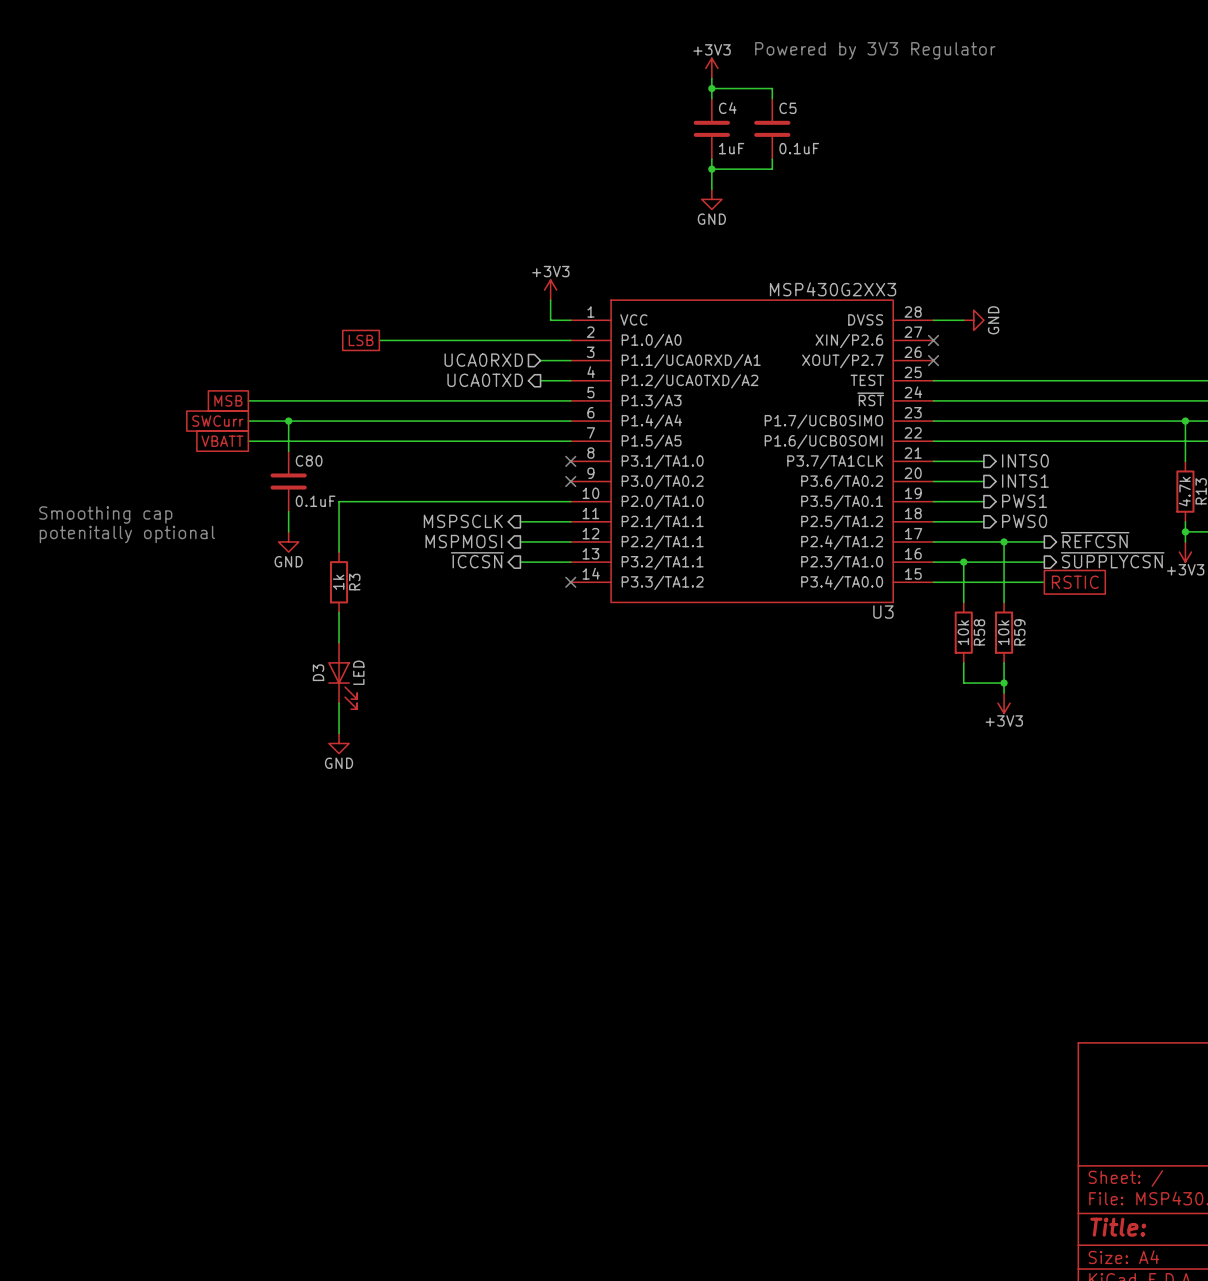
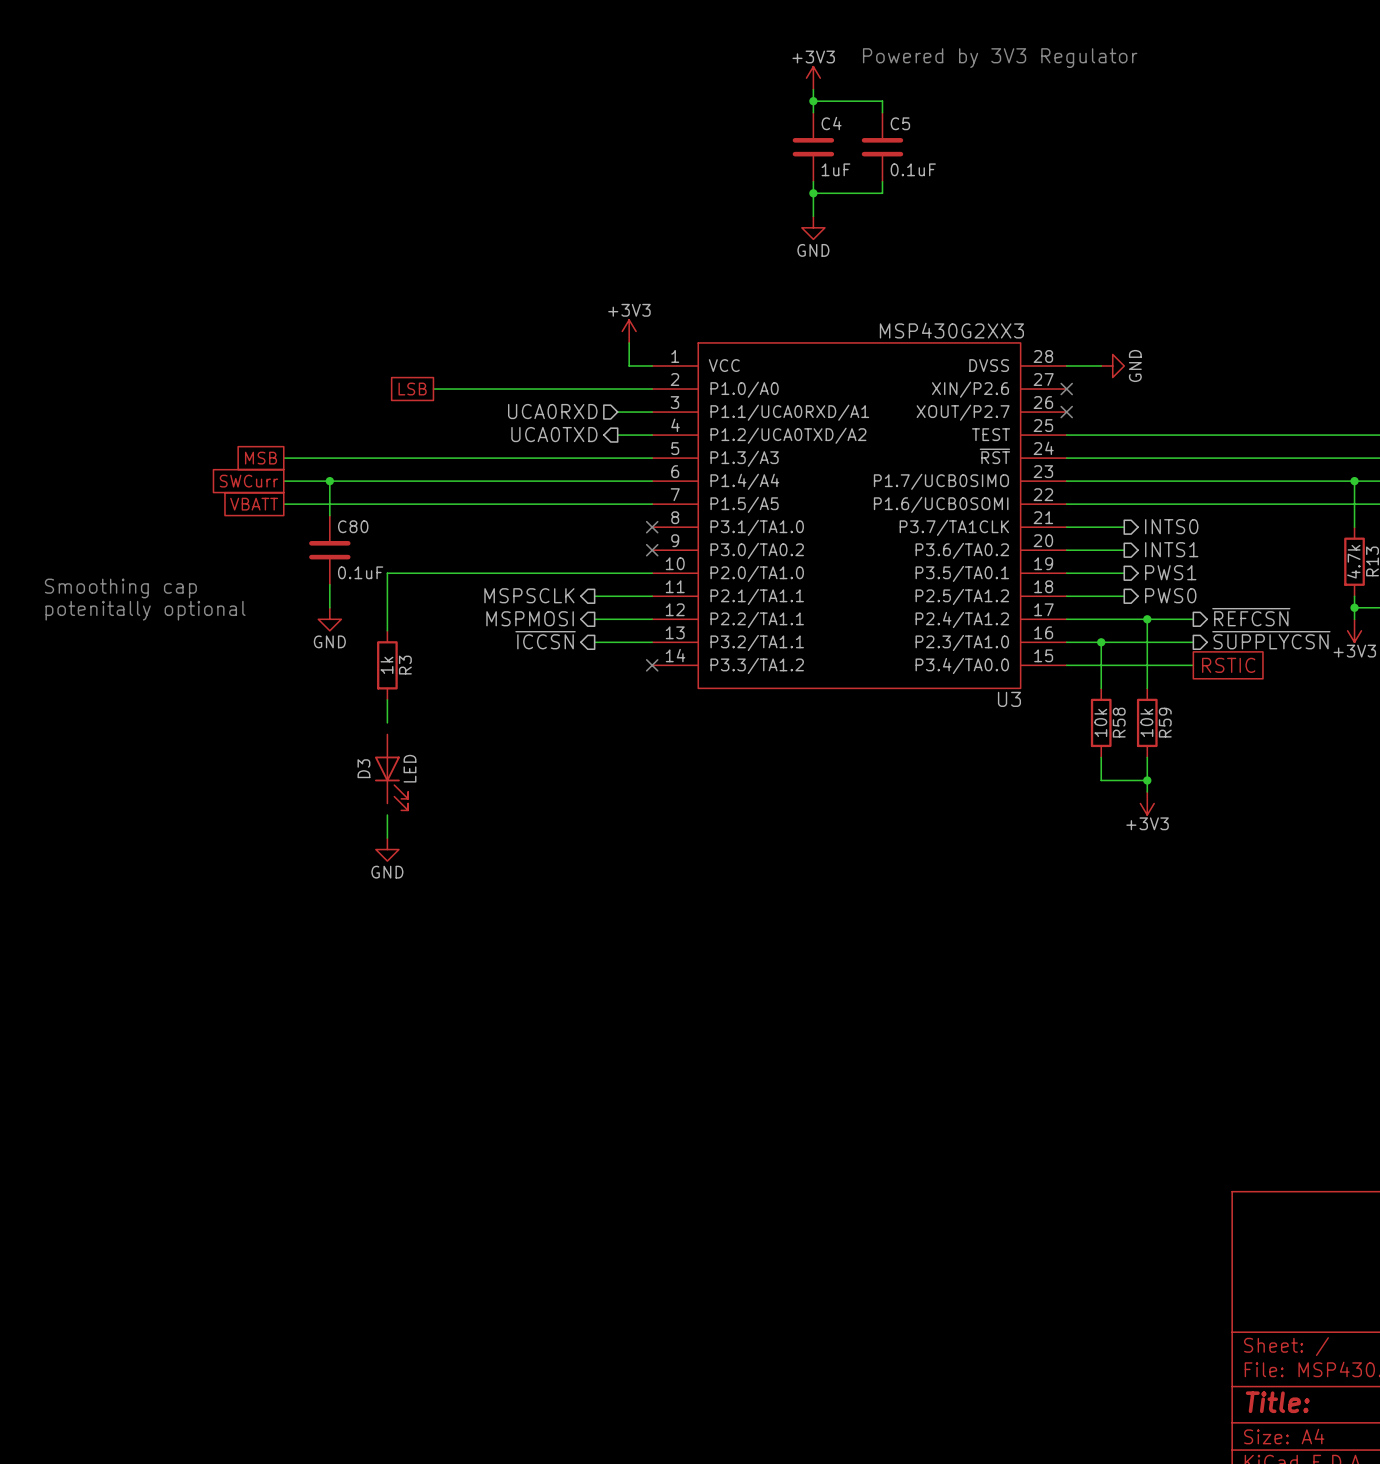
wire: (339, 632) (339, 642) -> none
wire: (339, 703) (339, 713) -> none

